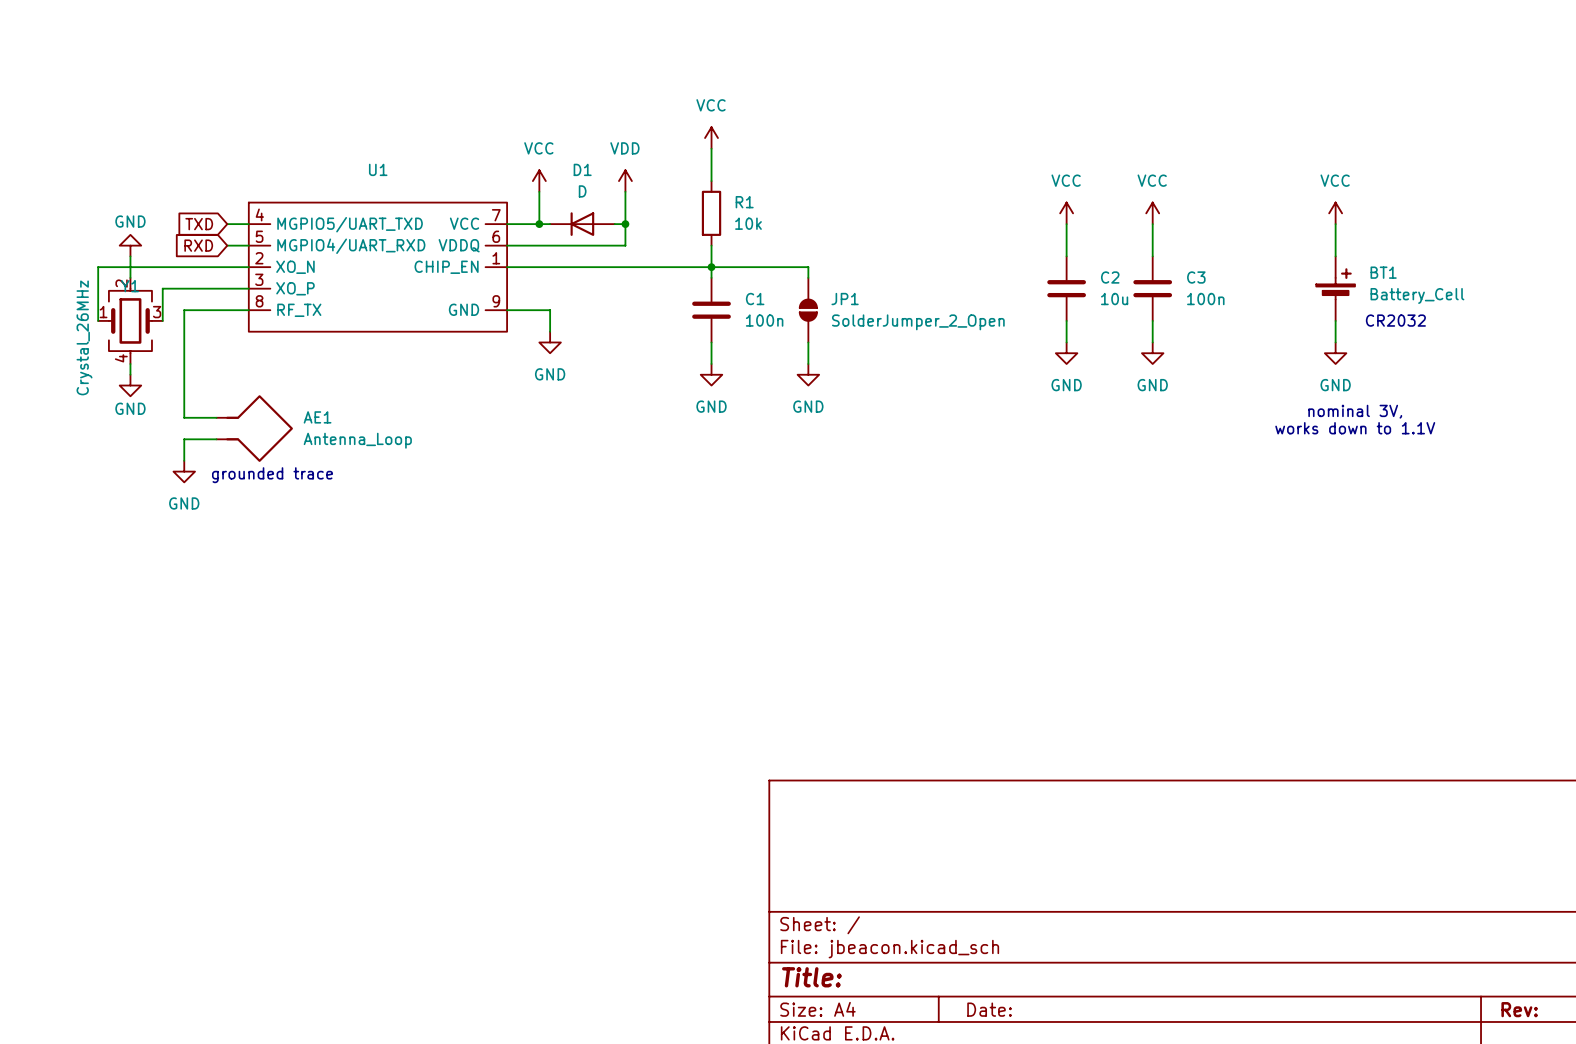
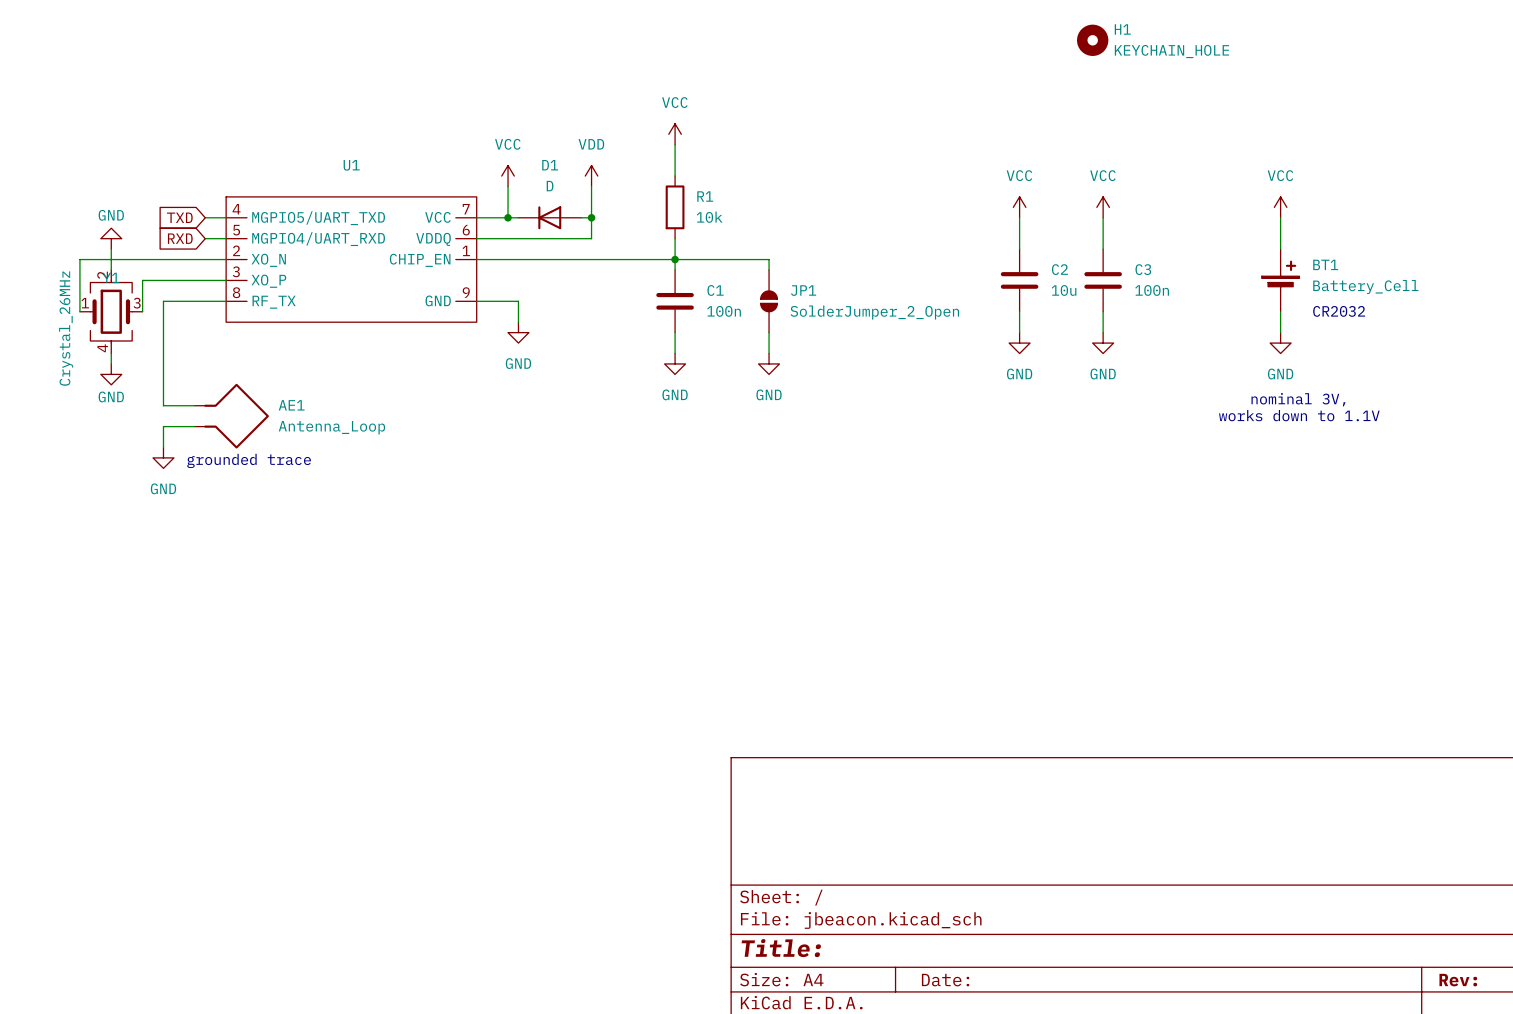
H1: none -> KEYCHAIN_HOLE (1092, 40)

